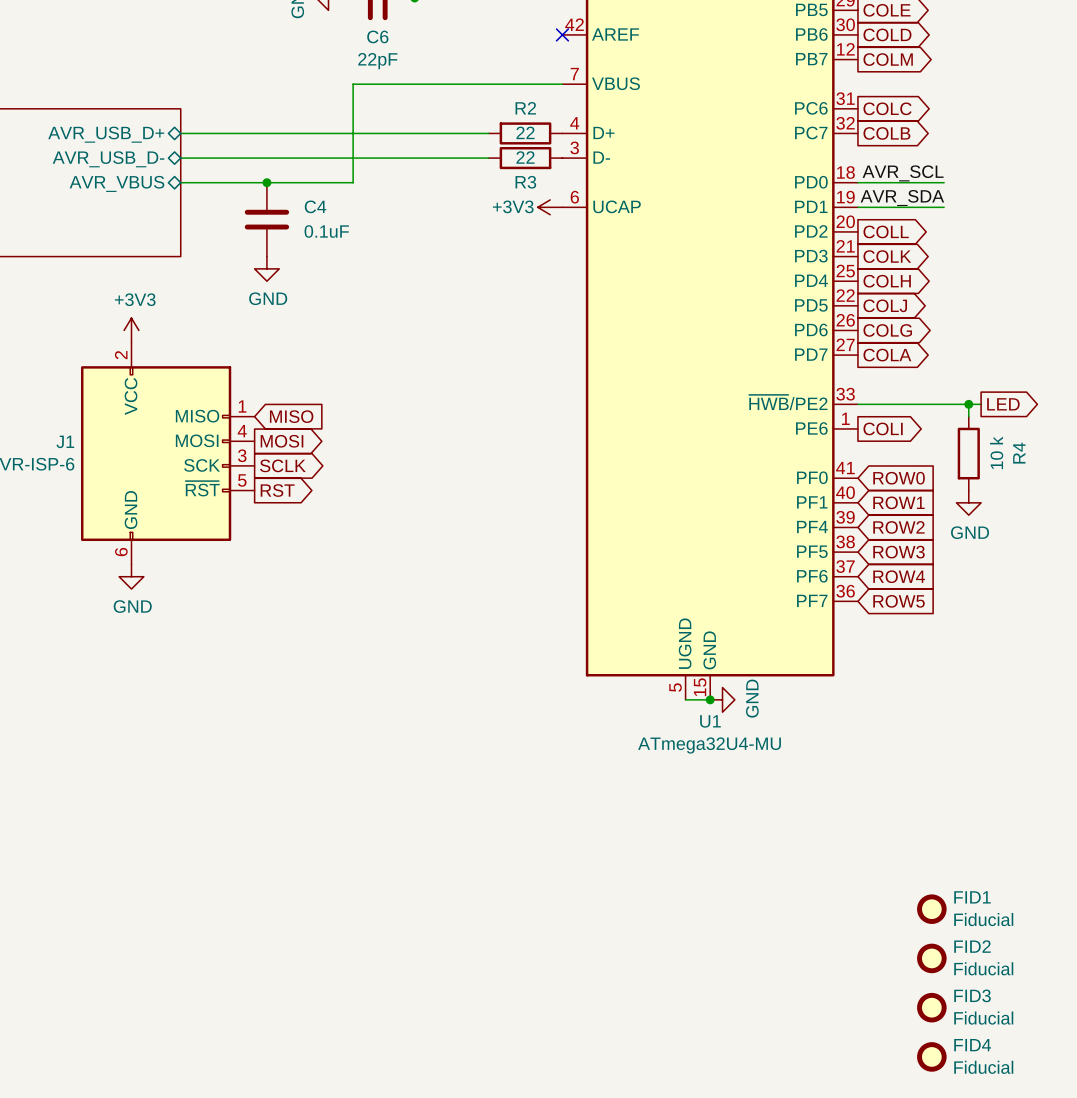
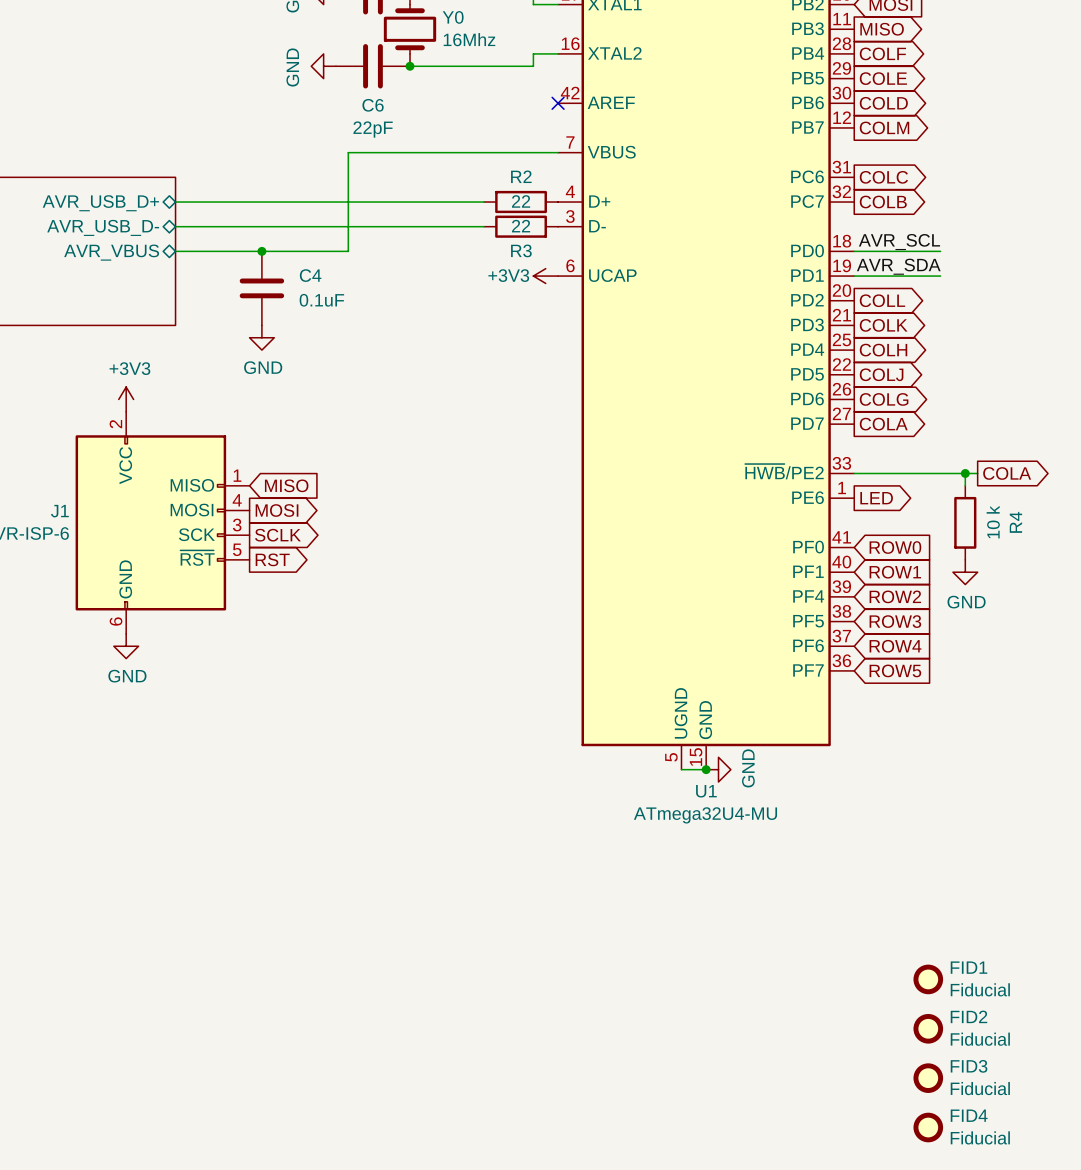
global label: LED (1003, 404) -> COLA (1007, 473)
global label: COLI (883, 428) -> LED (876, 498)

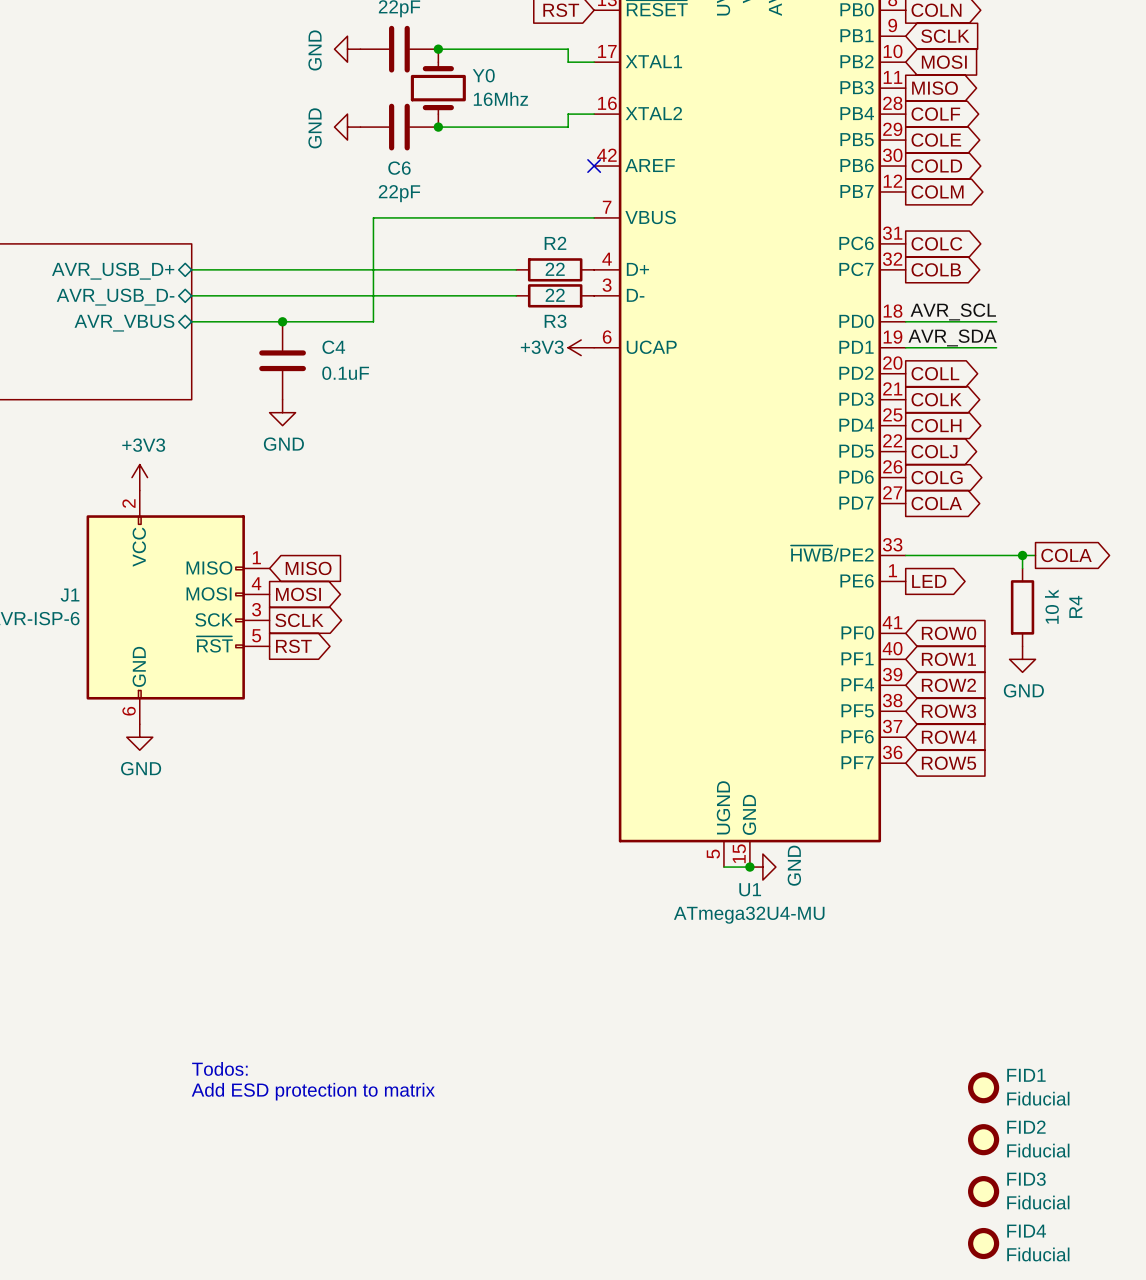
text: none -> Todos: (219, 1068)
text: none -> Add ESD protection to matrix (313, 1091)

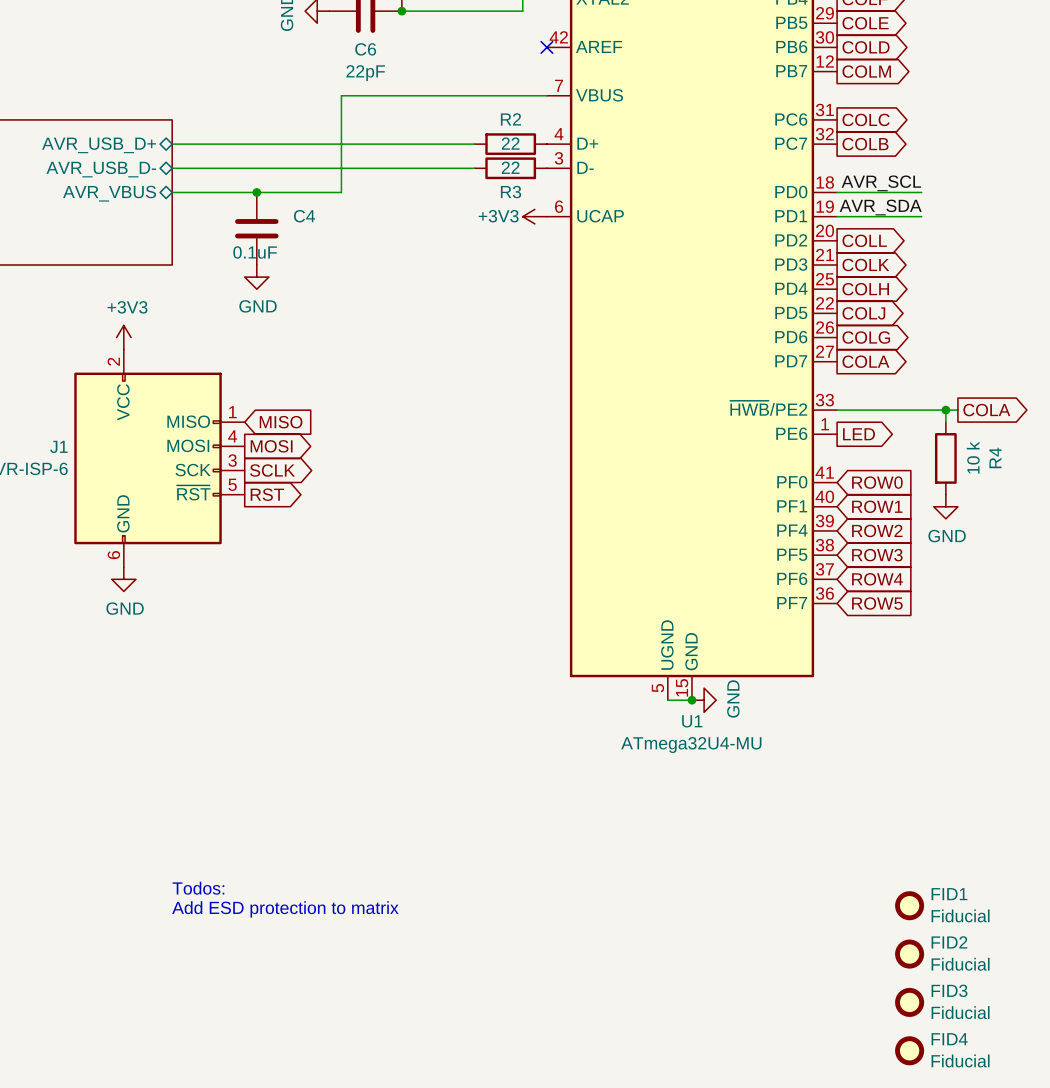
C4 value position: 0.1uF (345, 373) -> 0.1uF (255, 252)

